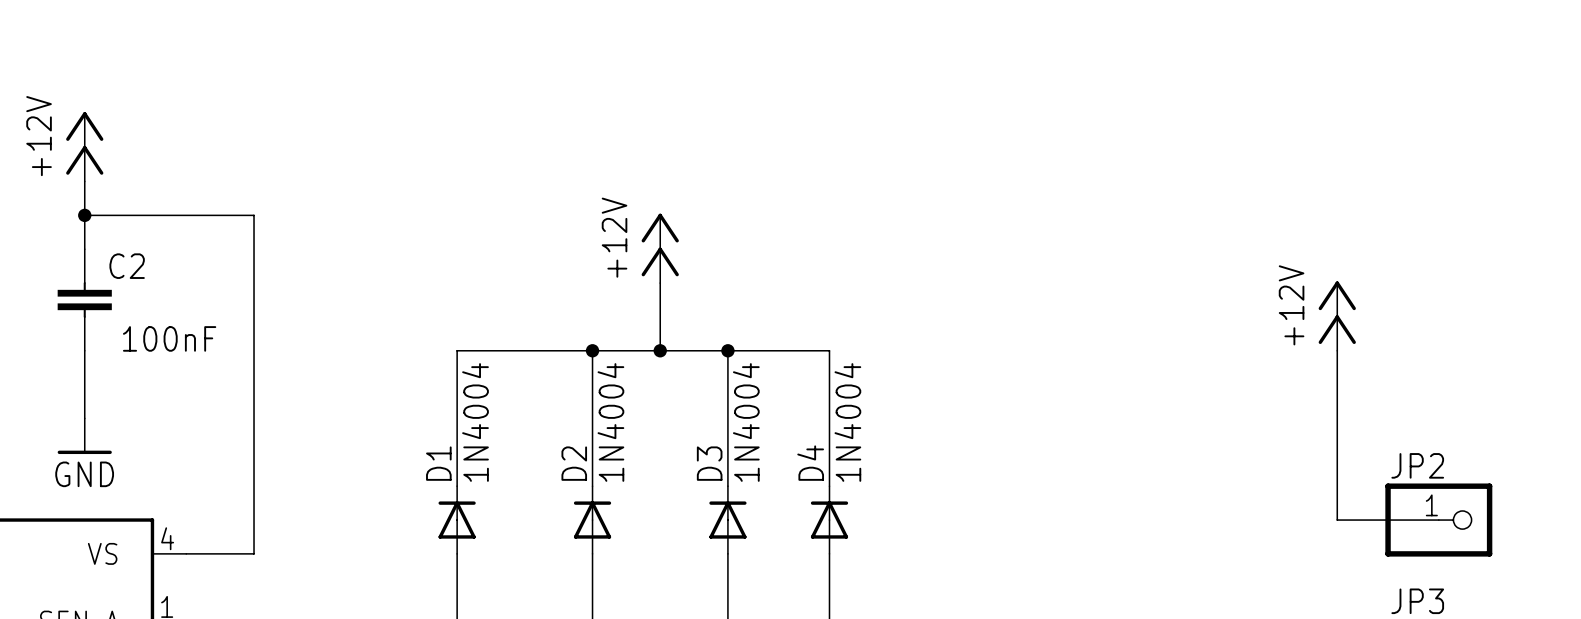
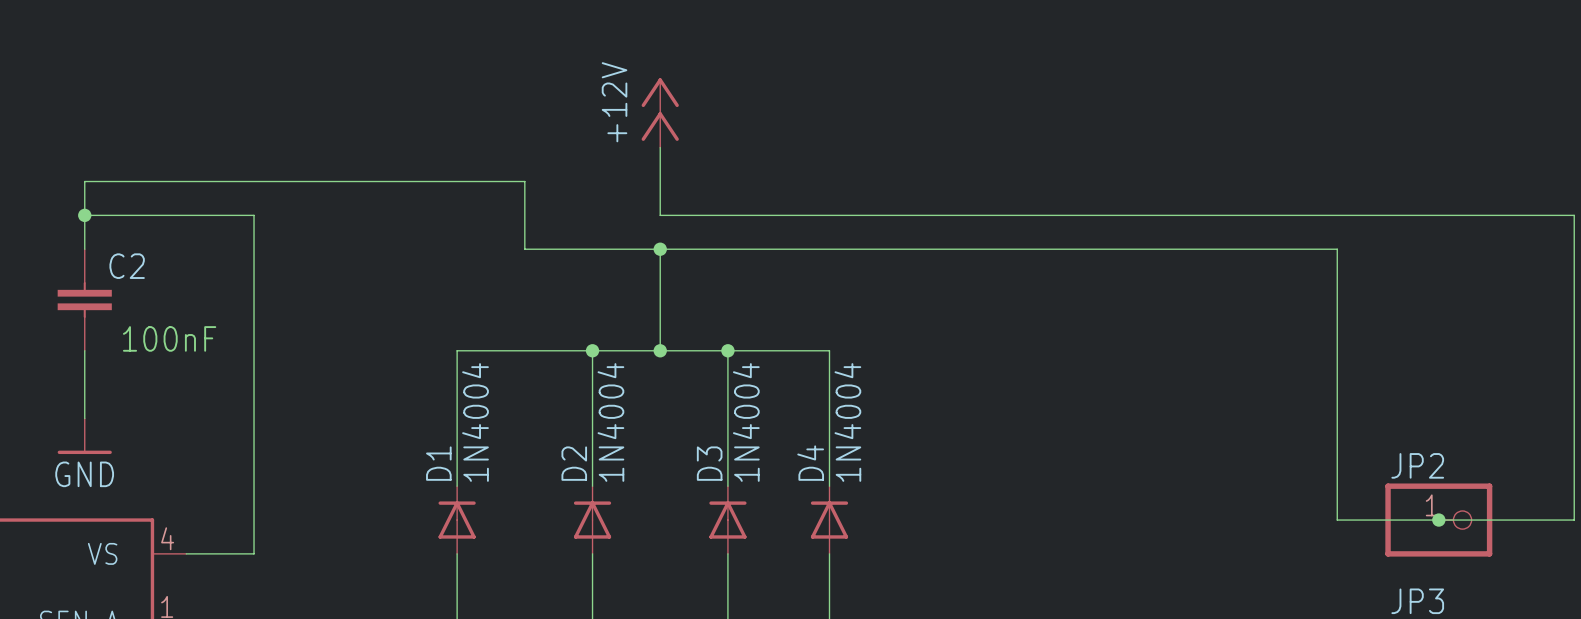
power symbol: (84, 129) -> none
wire: none -> (660, 147) (660, 215) (1574, 215) (1574, 520) (1438, 520)
power symbol: +12V (84, 163) -> none
wire: none -> (84, 181) (524, 181) (524, 249) (1337, 249) (1337, 350)
power symbol position: (660, 231) -> (660, 96)
junction: none -> (660, 249)
power symbol position: +12V (660, 265) -> +12V (660, 129)
power symbol: (1337, 299) -> none
power symbol: +12V (1337, 333) -> none
junction: none -> (1438, 520)

